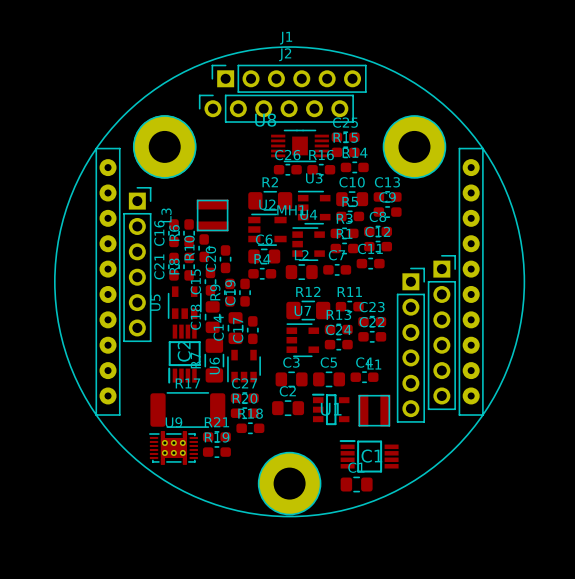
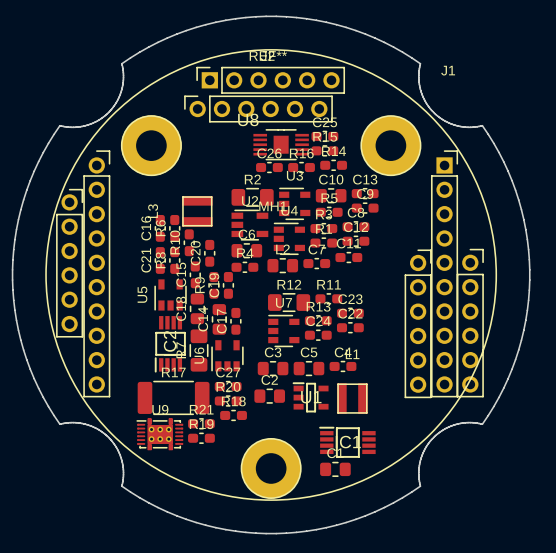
board edge: none -> (266, 16) (235, 18) (205, 24) (176, 34) (148, 47) (121, 63) (123, 77) (121, 92) (115, 104) (106, 114) (96, 121) (83, 126) (59, 125) (38, 161) (23, 199) (14, 239) (12, 280) (14, 310) (20, 340) (30, 369) (43, 397) (59, 424) (73, 422) (88, 425) (100, 430) (111, 440) (117, 449) (122, 462) (121, 486) (157, 507) (196, 522) (235, 531) (276, 533) (306, 531) (336, 525) (365, 515) (393, 502) (420, 486) (418, 472) (421, 457) (427, 445) (436, 435) (446, 428) (458, 423) (482, 424) (503, 388) (518, 349) (527, 310) (529, 269) (527, 239) (521, 209) (511, 180) (498, 152) (482, 125) (468, 127) (453, 124) (441, 118) (431, 109) (424, 100) (419, 87) (420, 63) (384, 42) (346, 27) (306, 18) (266, 16)
J1 name position: J1 (286, 38) -> J1 (448, 70)
J2 footprint: [54, 46, 526, 518] -> [45, 49, 498, 501]
J1 footprint: [123, 64, 456, 423] -> [56, 66, 484, 398]

